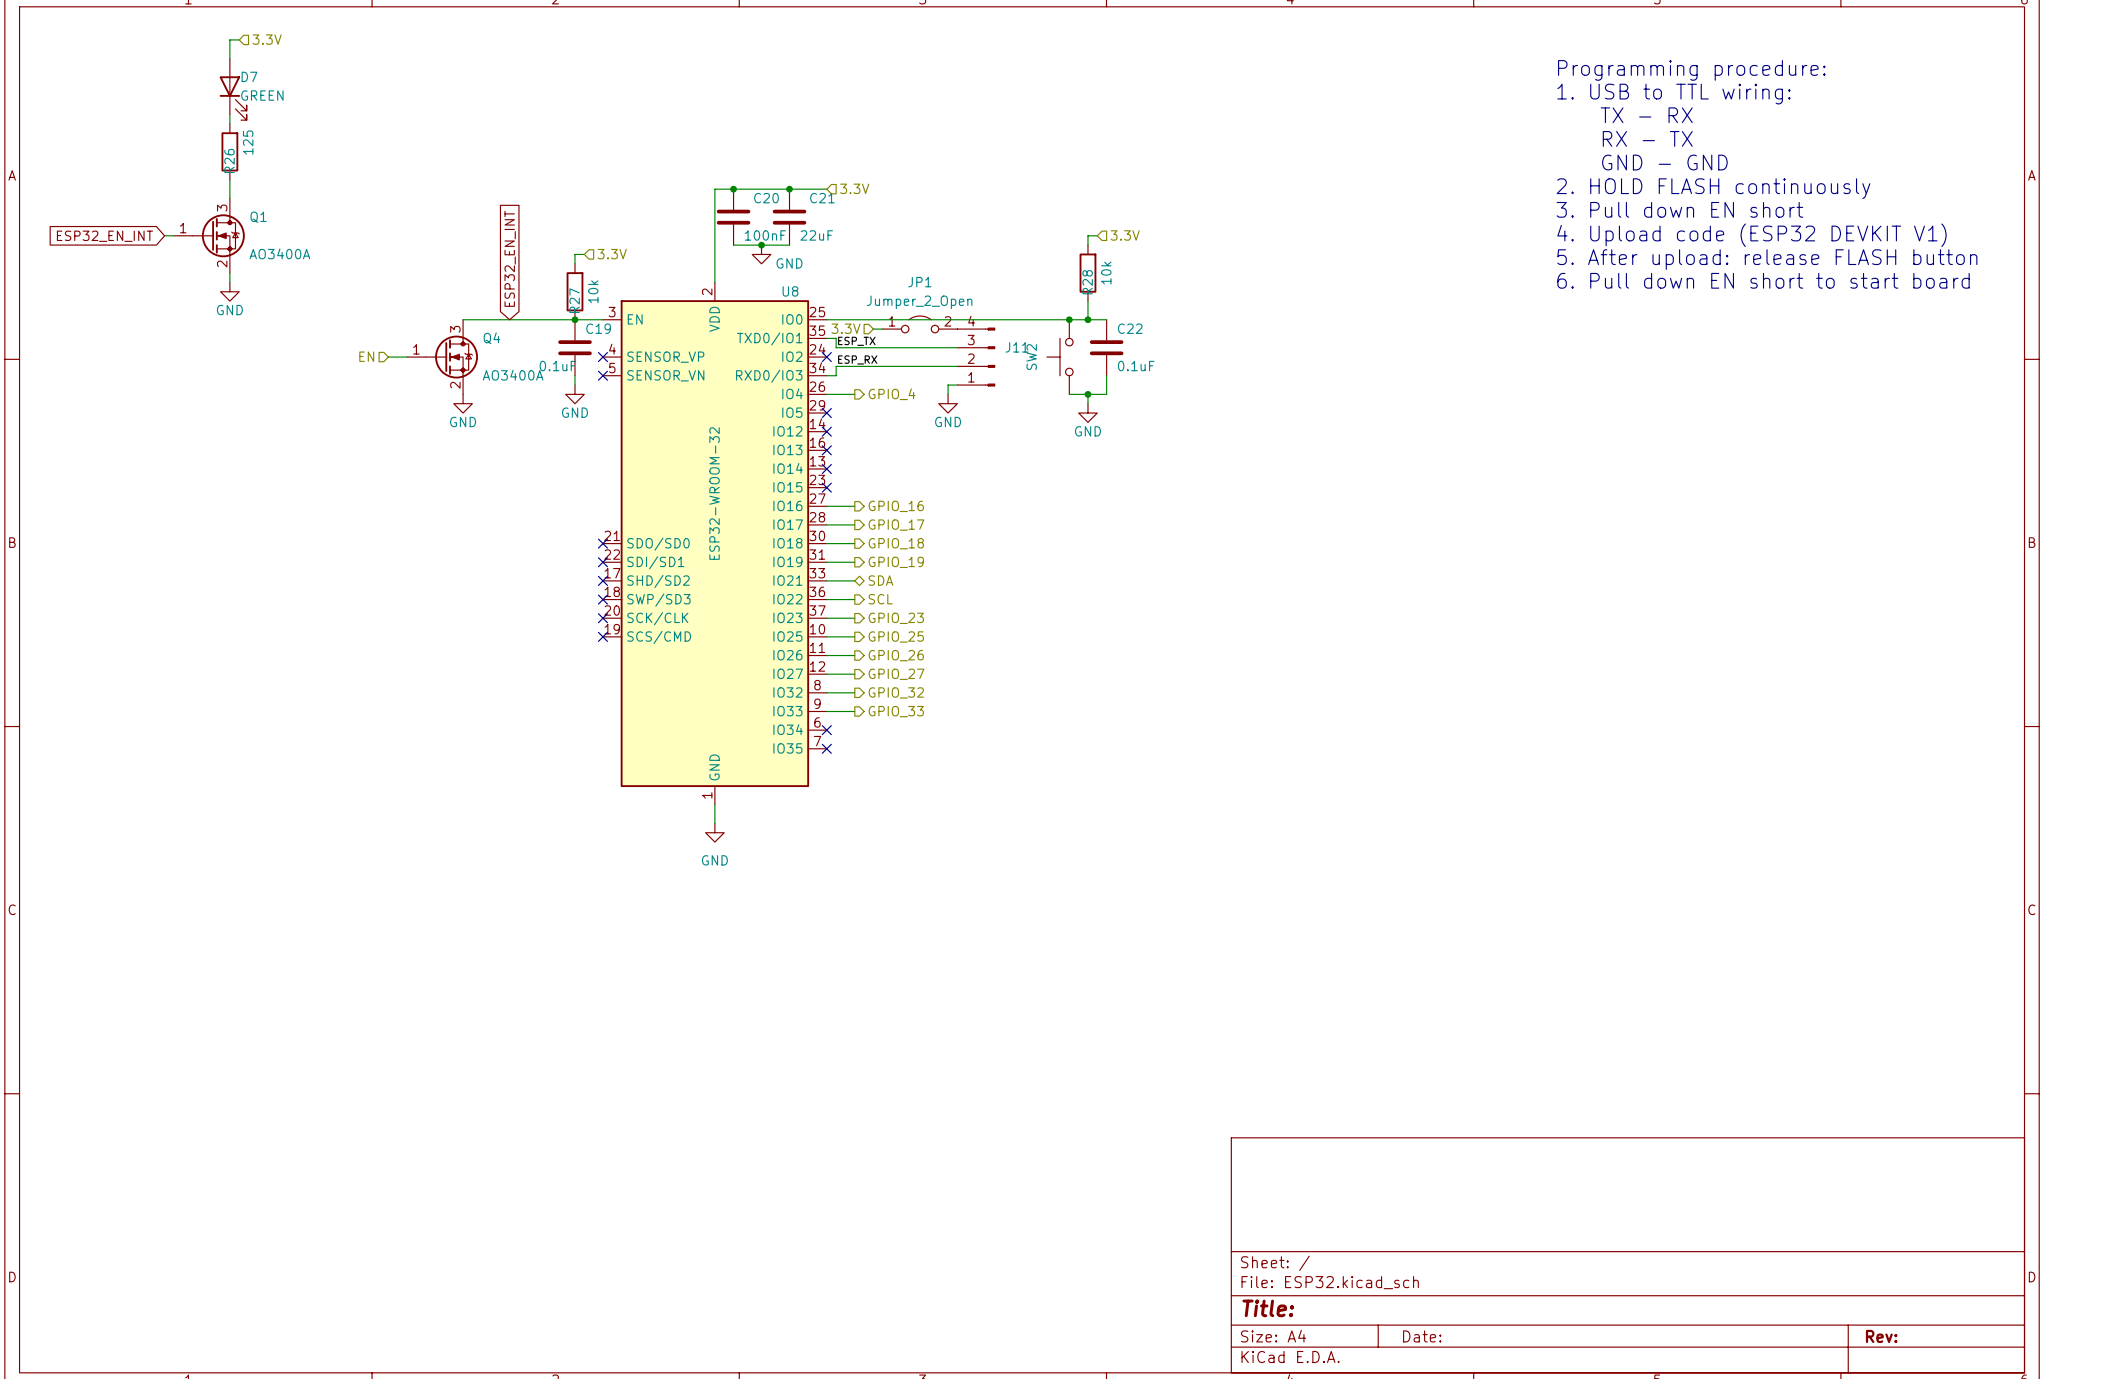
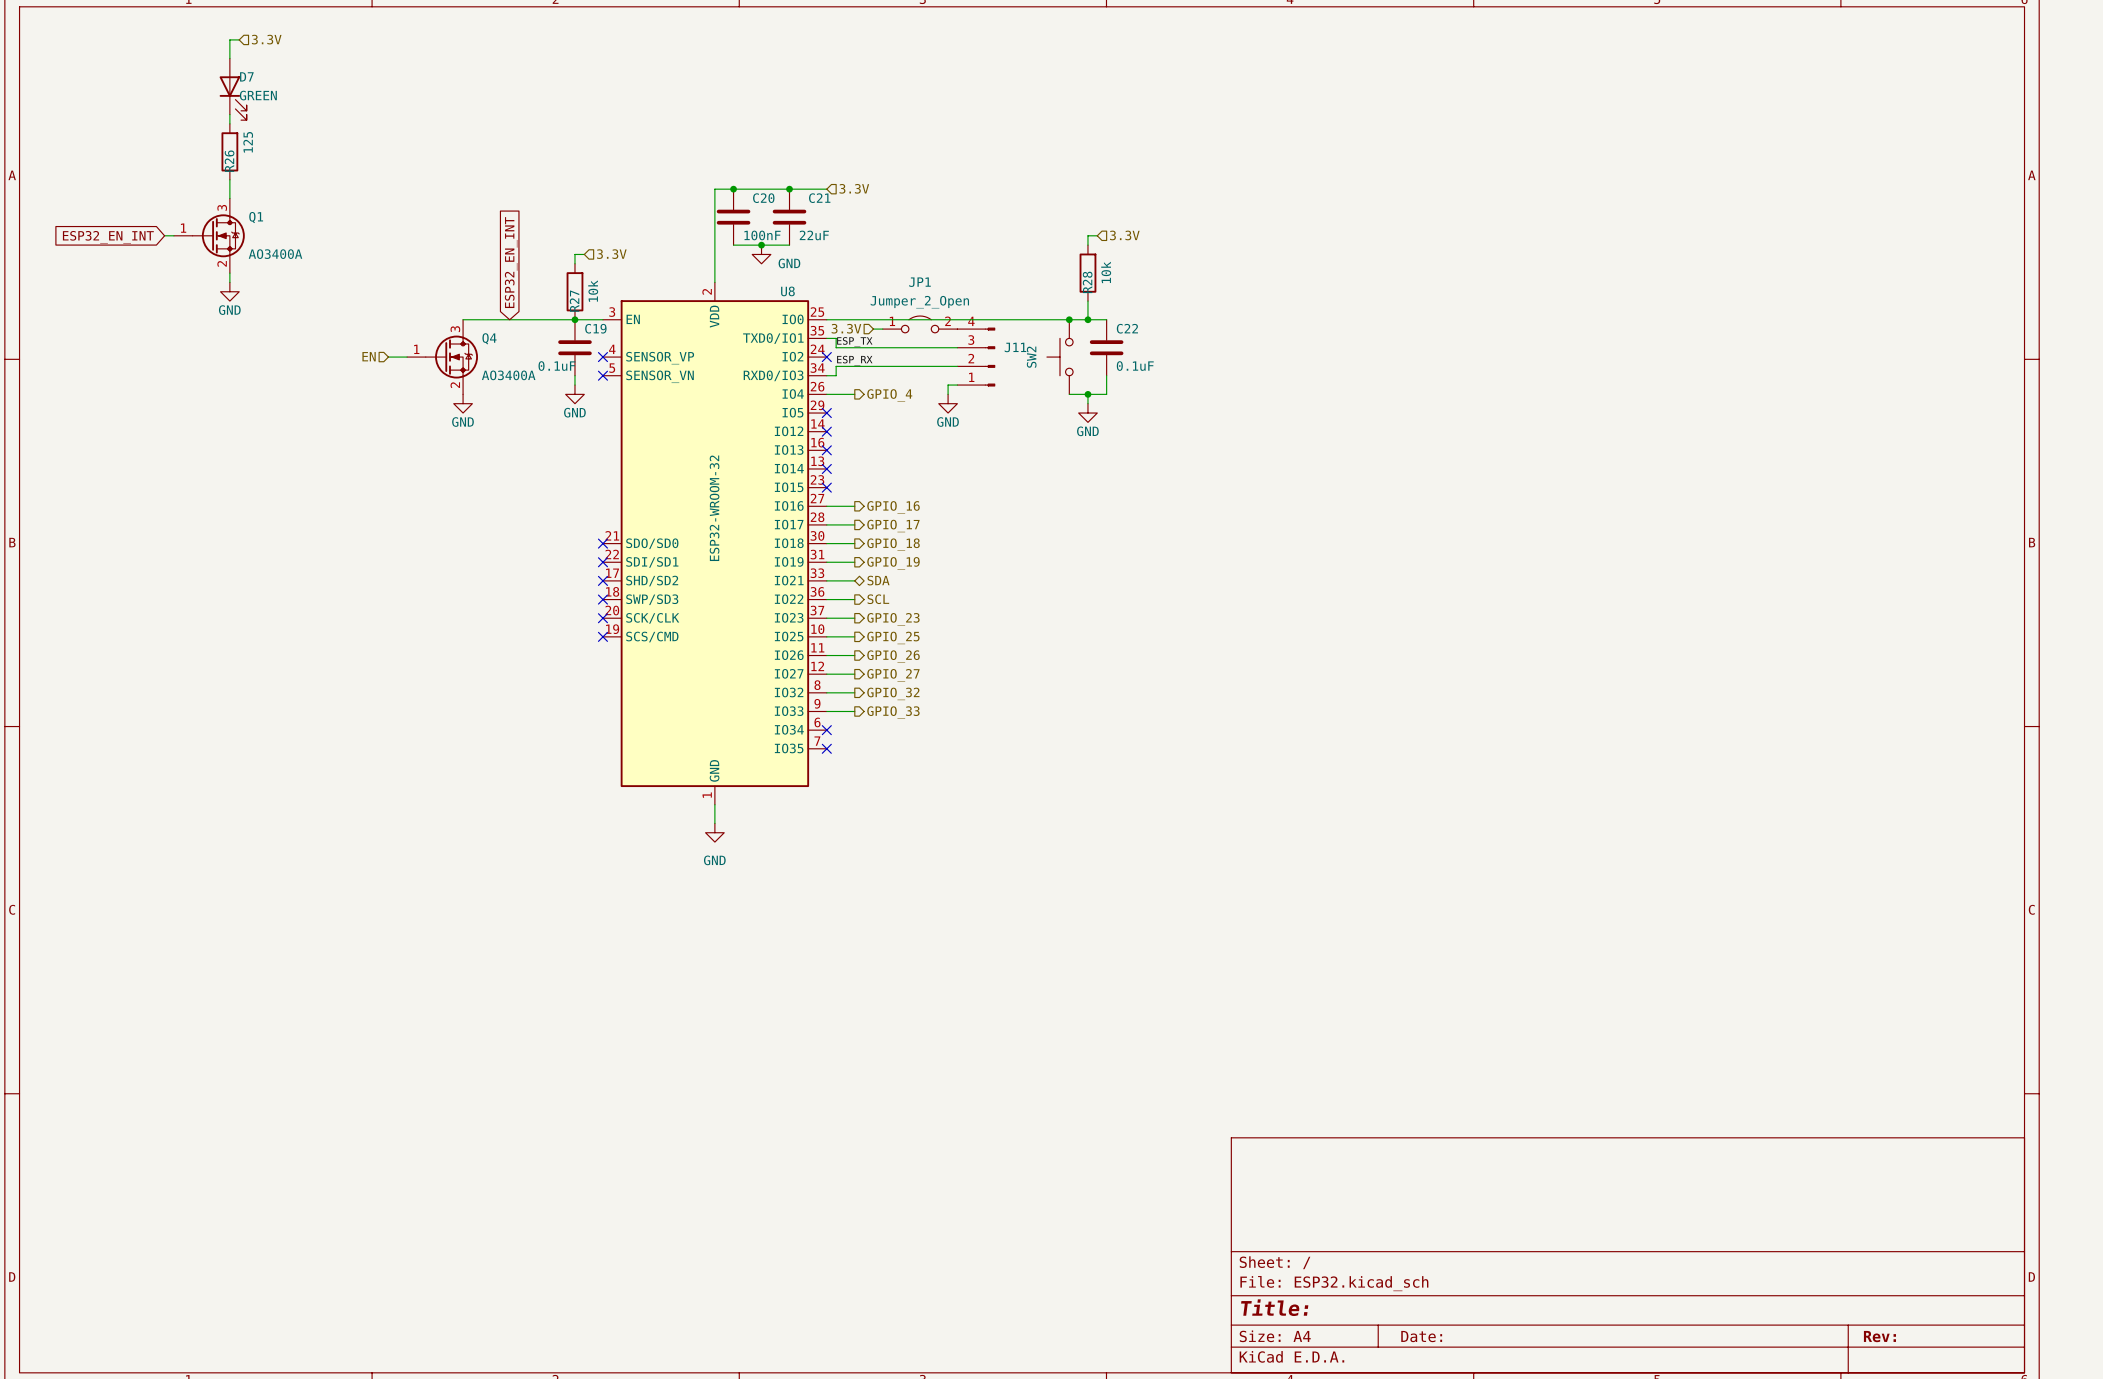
text: Programming procedure: (1691, 70) -> none
text: 1. USB to TTL wiring: (1673, 94) -> none
text: TX - RX (1646, 115) -> none
text: RX - TX (1647, 138) -> none
text: GND - GND (1664, 162) -> none
text: 2. HOLD FLASH continuously (1713, 188) -> none
text: 3. Pull down EN short (1679, 209) -> none
text: 4. Upload code (ESP32 DEVKIT V1) (1751, 235) -> none
text: 5. After upload: release FLASH button (1767, 259) -> none
text: 6. Pull down EN short to start board (1763, 280) -> none

